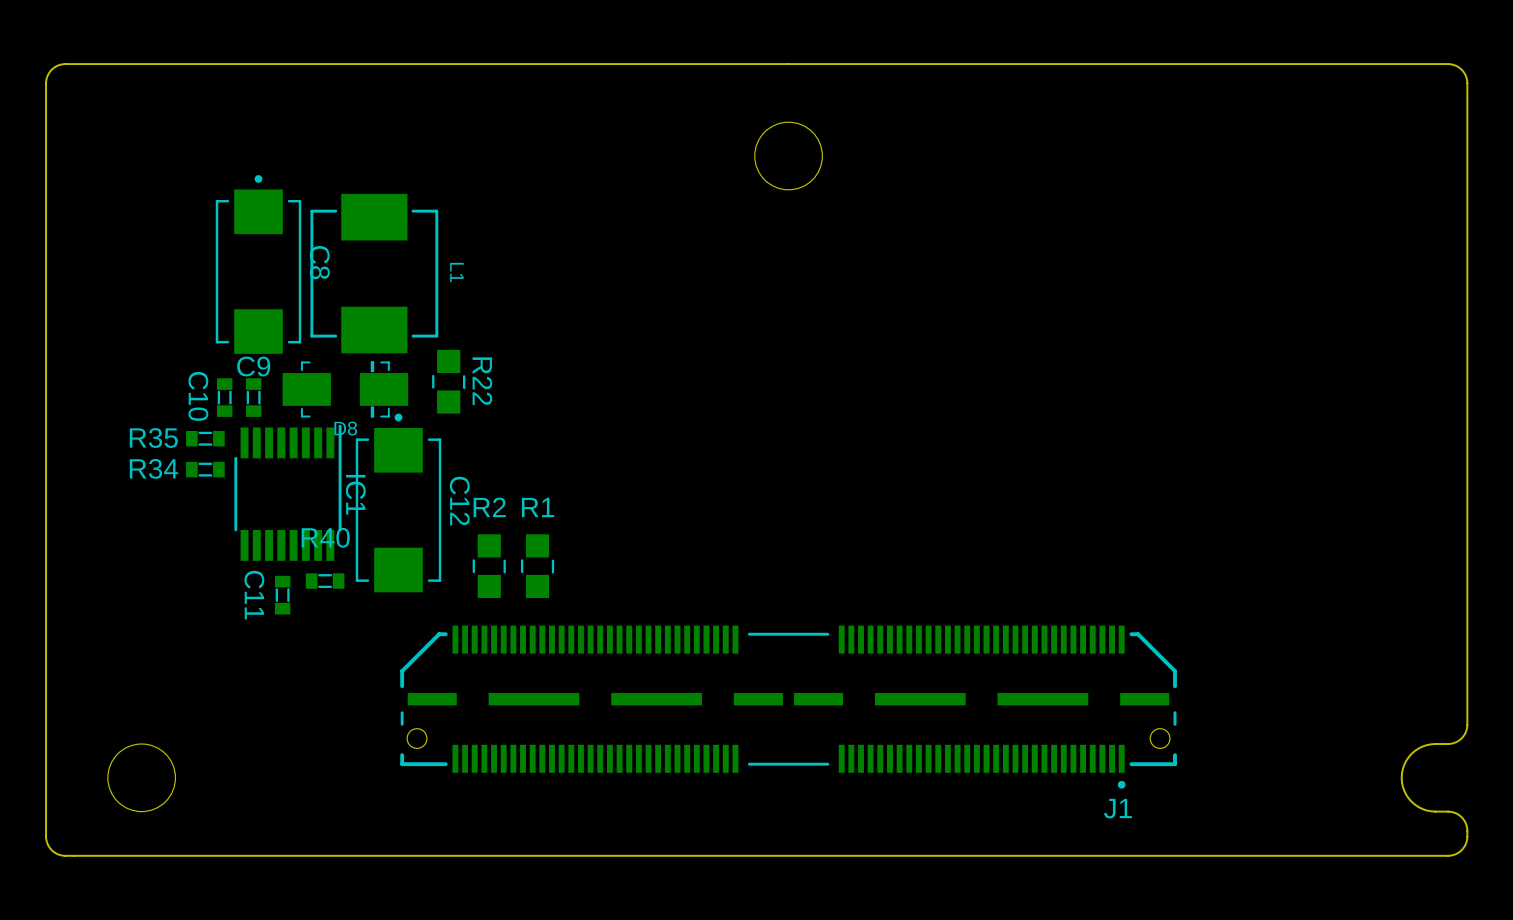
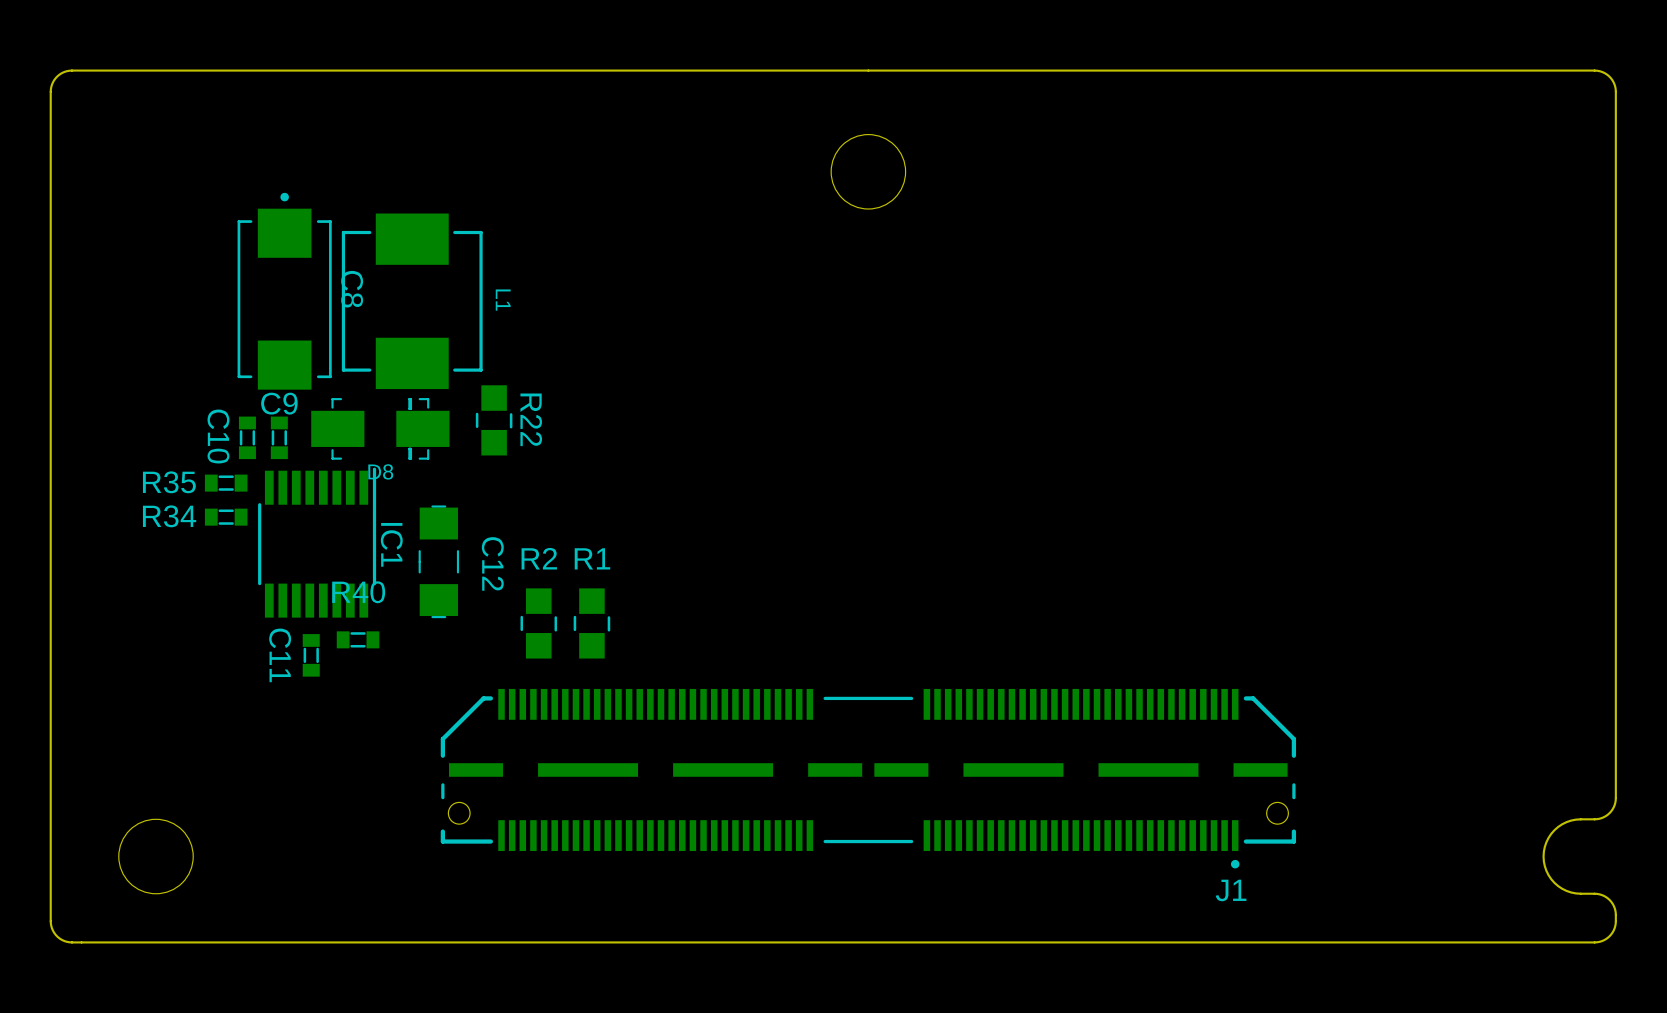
C12 footprint: [355, 413, 442, 593] -> [418, 505, 460, 619]

